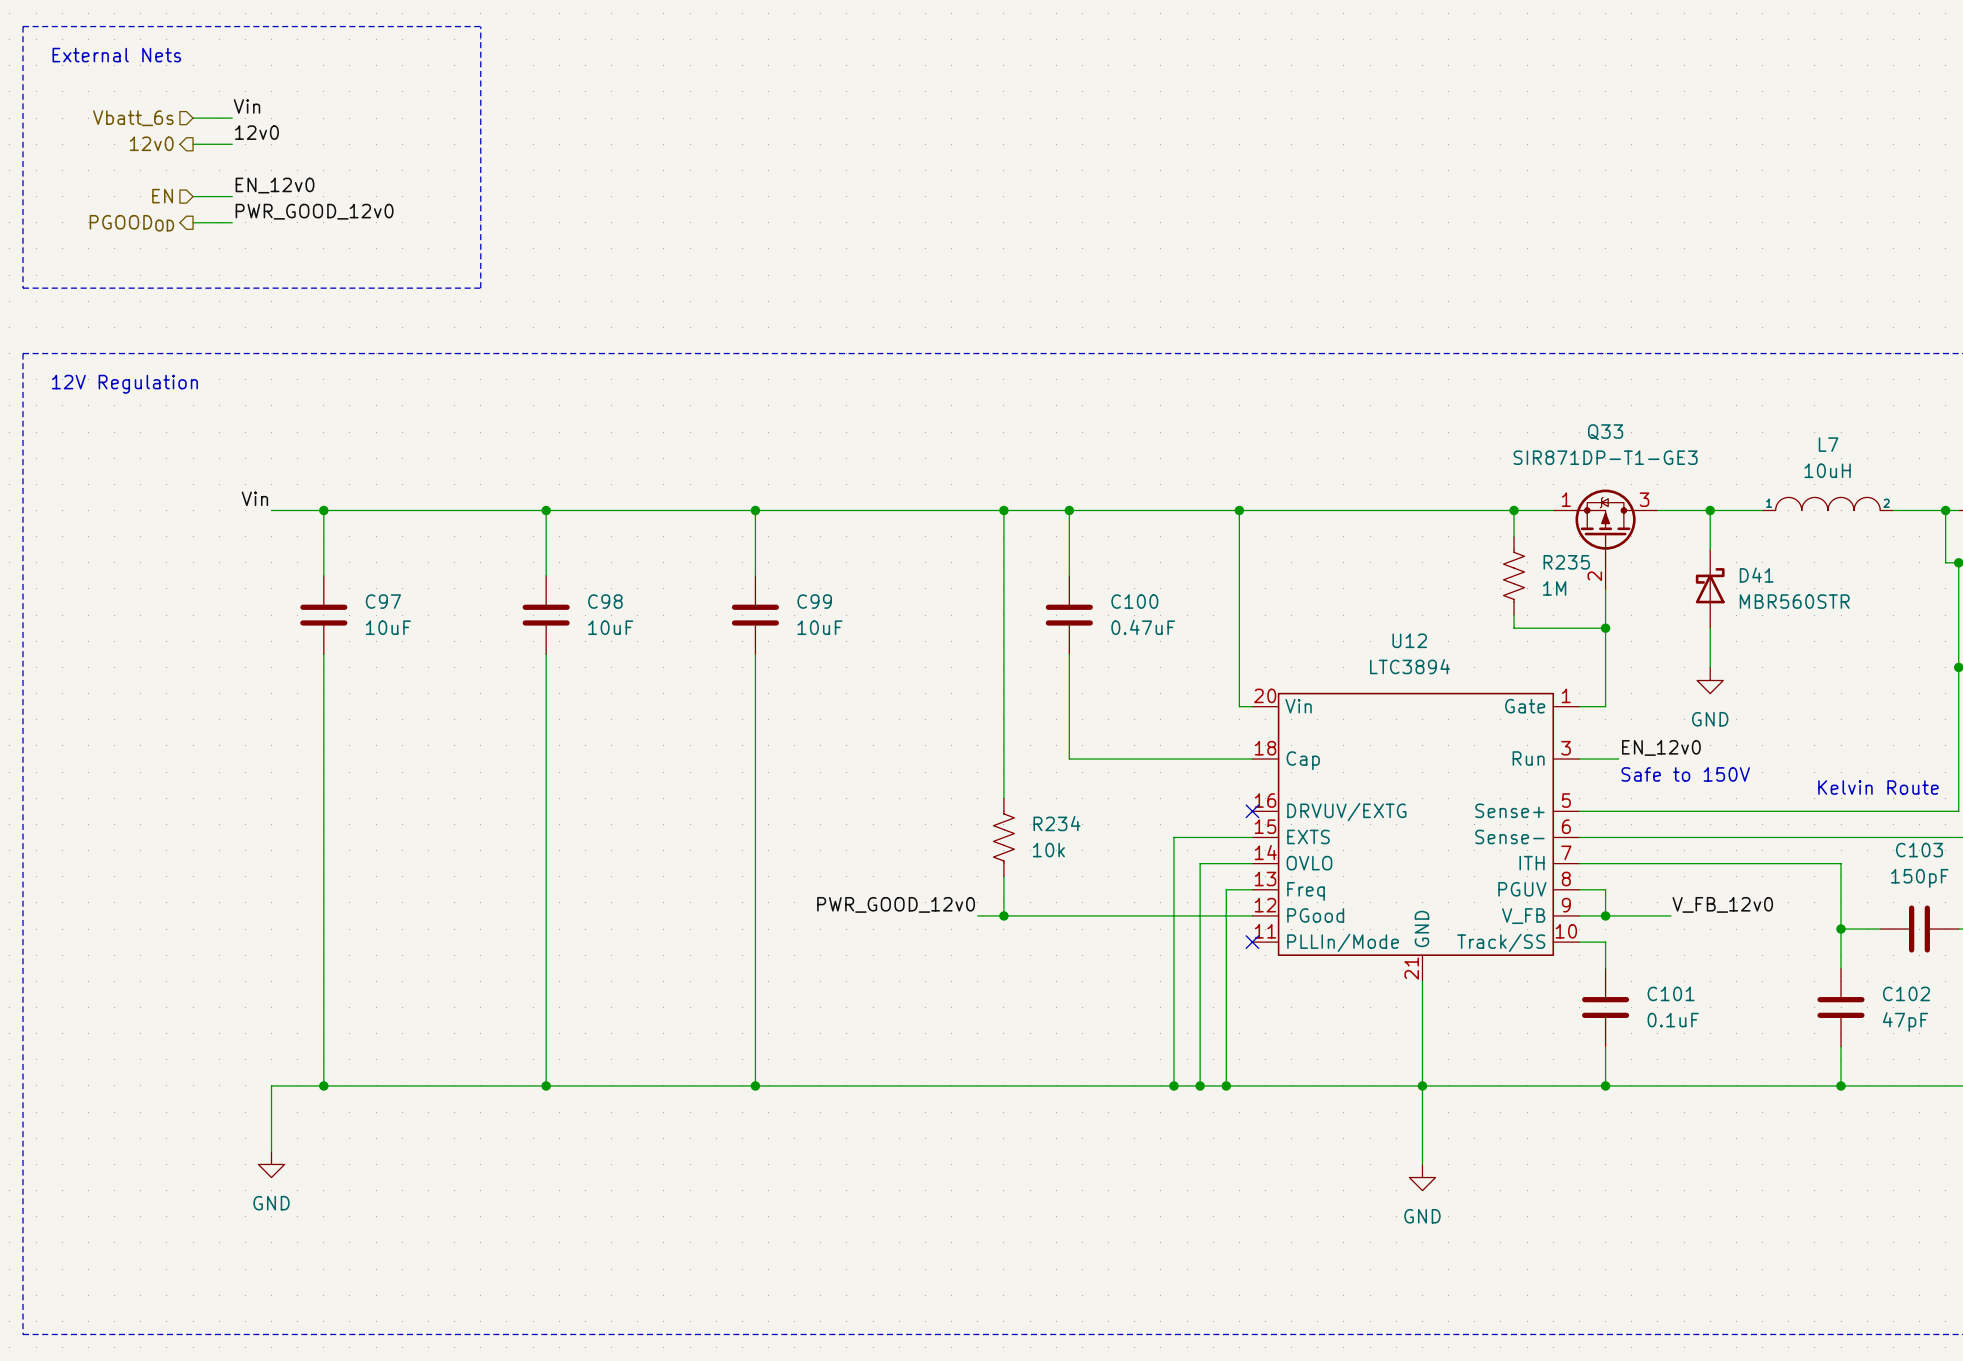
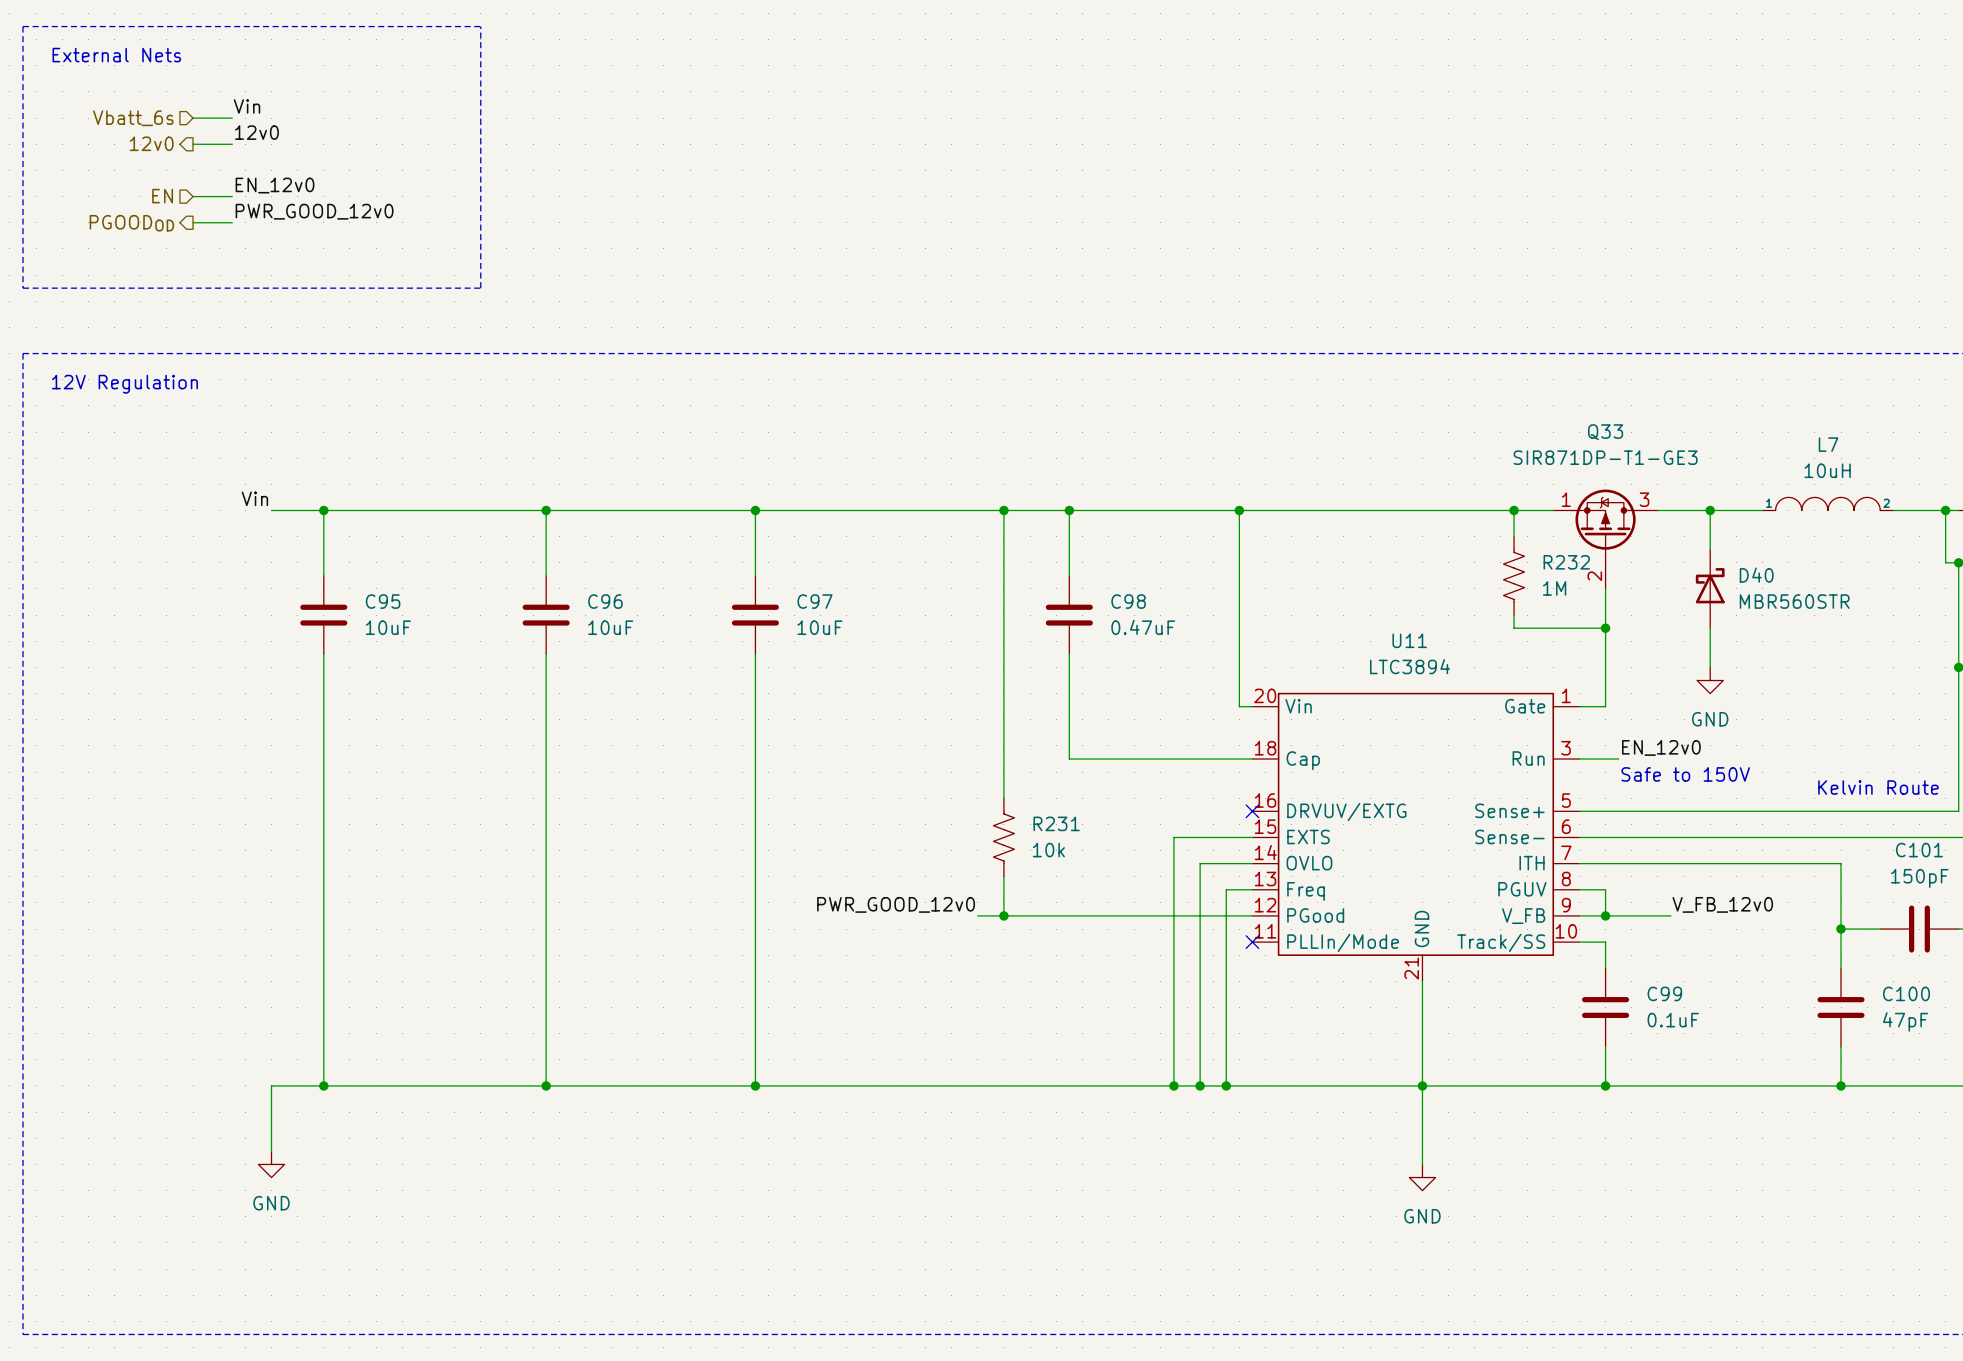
R235 name: R235 (1566, 562) -> R232 (1566, 562)
D41 name: D41 (1756, 575) -> D40 (1756, 575)
C97 name: C97 (383, 601) -> C95 (383, 601)
C98 name: C98 (605, 601) -> C96 (605, 601)
C99 name: C99 (814, 601) -> C97 (815, 601)
C100 name: C100 (1134, 601) -> C98 (1128, 601)
U12 name: U12 (1409, 640) -> U11 (1409, 640)
R234 name: R234 (1056, 823) -> R231 (1056, 823)
C103 name: C103 (1919, 850) -> C101 (1919, 850)
C101 name: C101 (1671, 993) -> C99 (1664, 993)
C102 name: C102 (1906, 993) -> C100 (1906, 993)

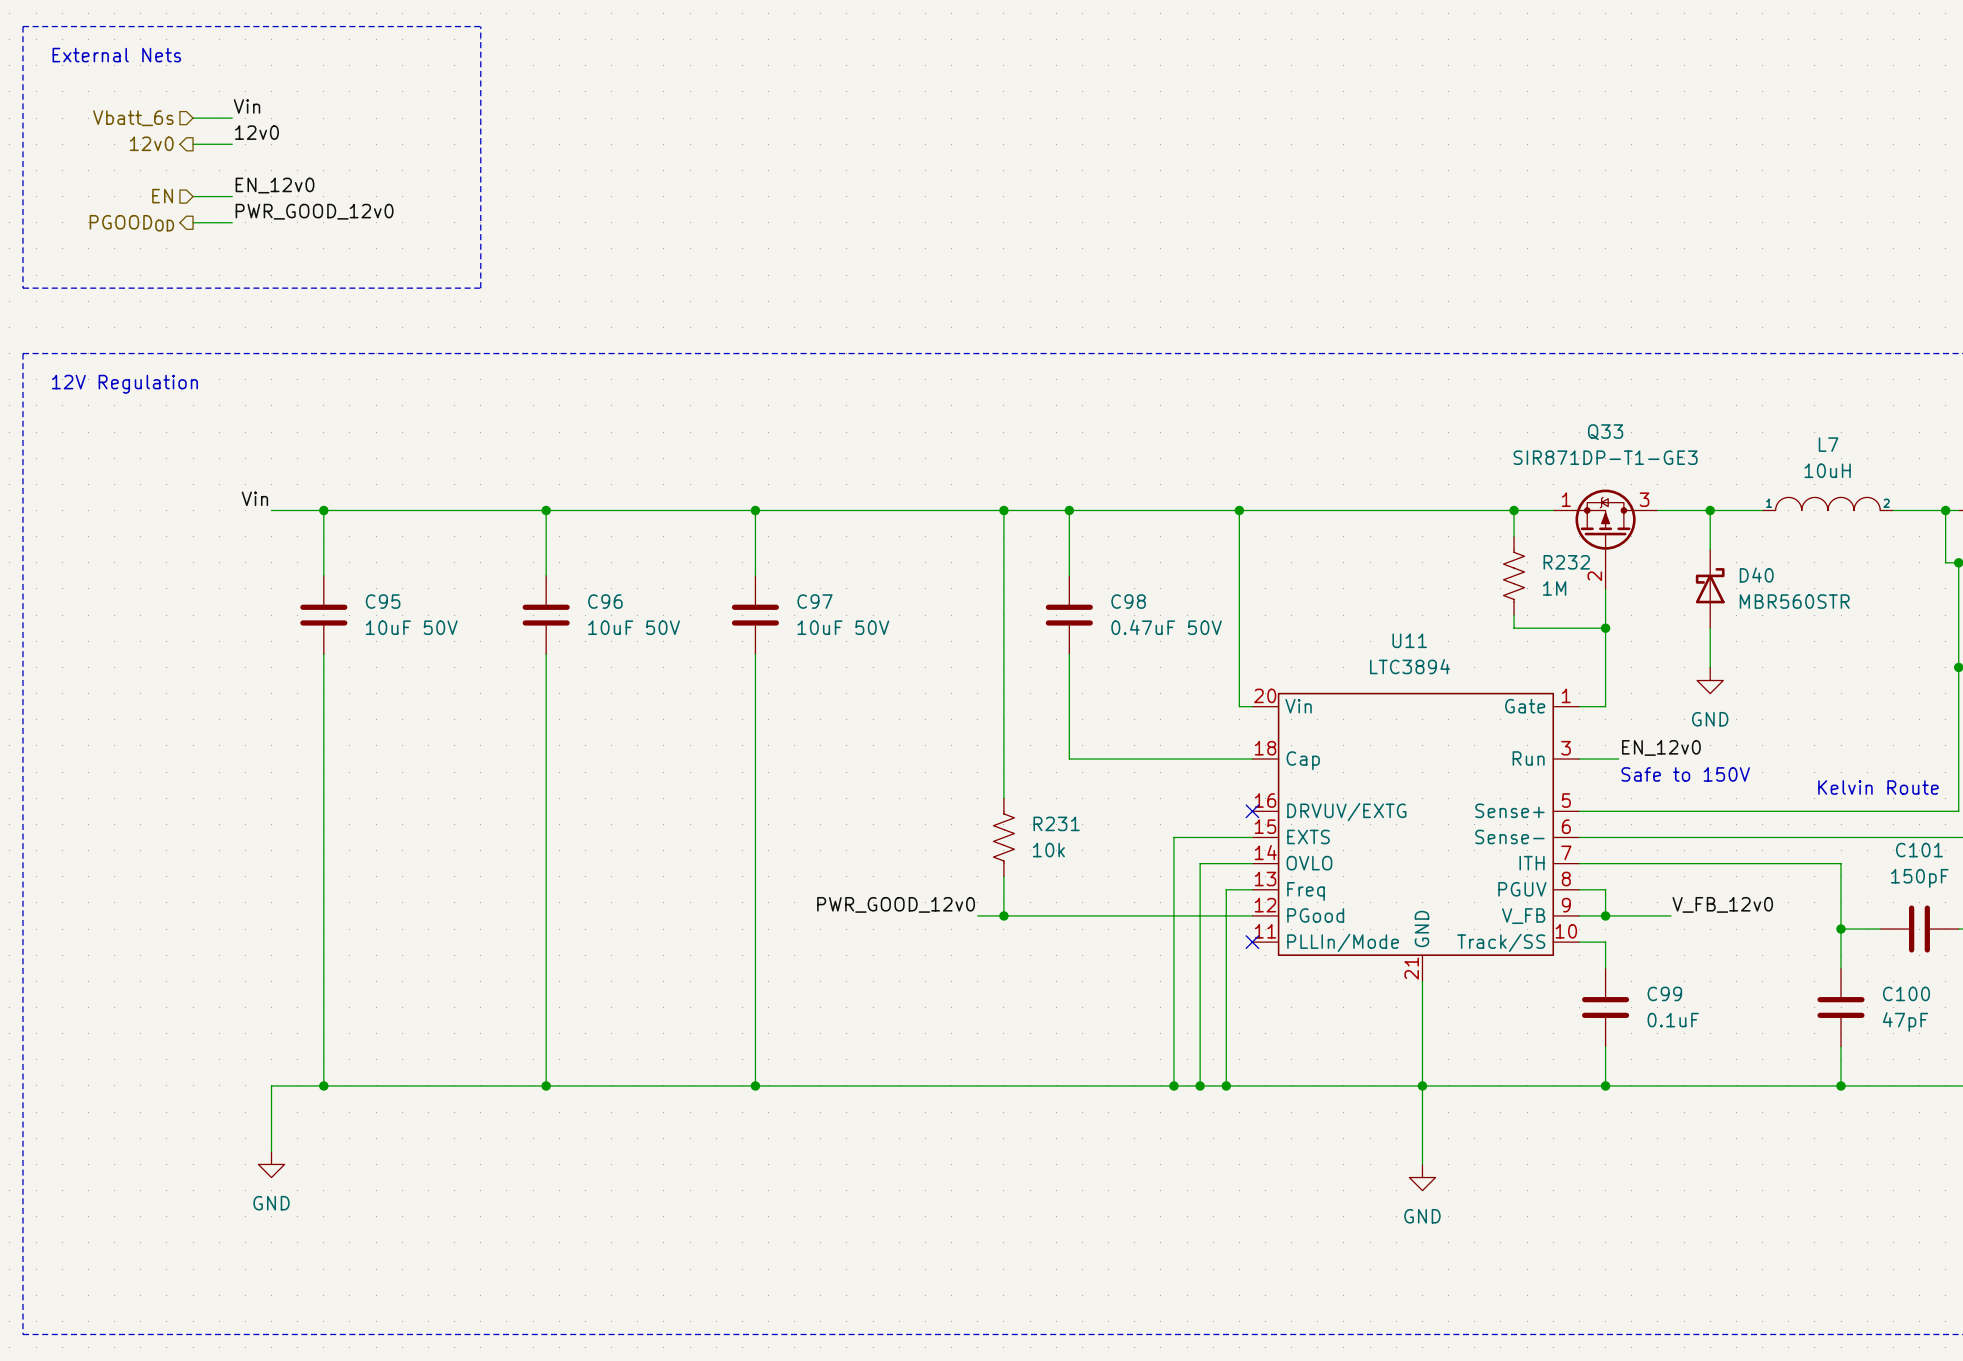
C95 value: 10uF (388, 627) -> 10uF 50V (411, 627)
C96 value: 10uF (610, 627) -> 10uF 50V (634, 627)
C97 value: 10uF (819, 627) -> 10uF 50V (843, 627)
C98 value: 0.47uF (1143, 627) -> 0.47uF 50V (1166, 627)

